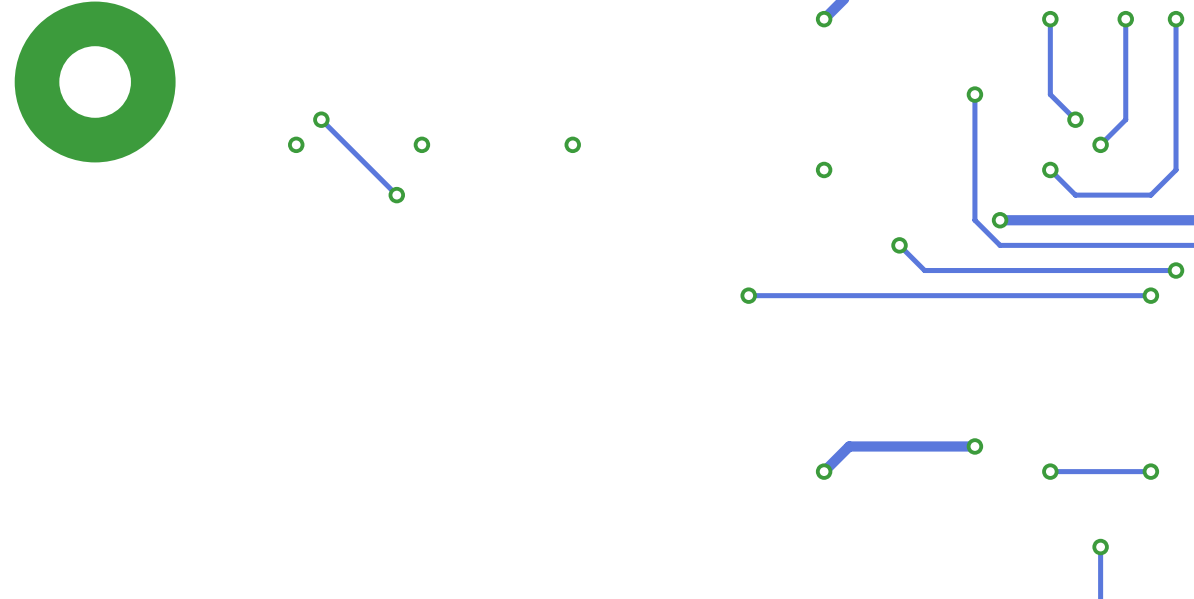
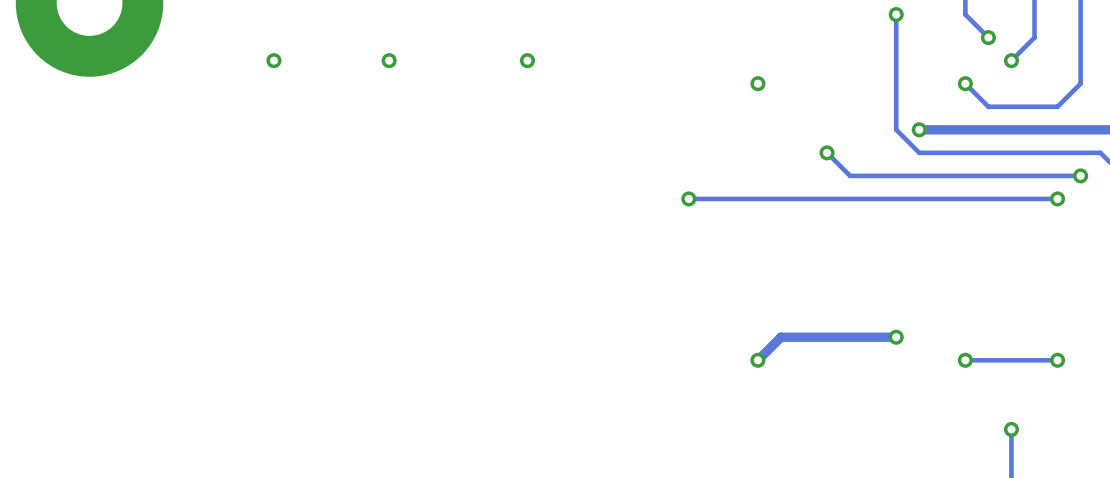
track: (321, 119) (396, 195) -> none
via: (321, 119) -> none
via: (396, 195) -> none

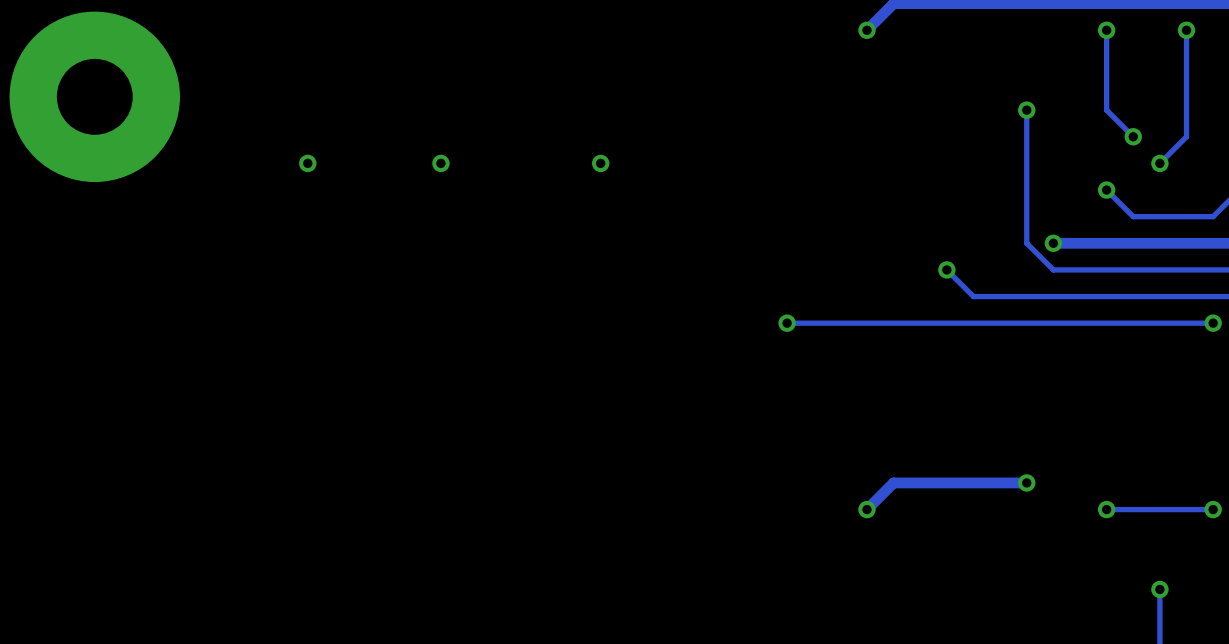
via: (757, 83) -> none

